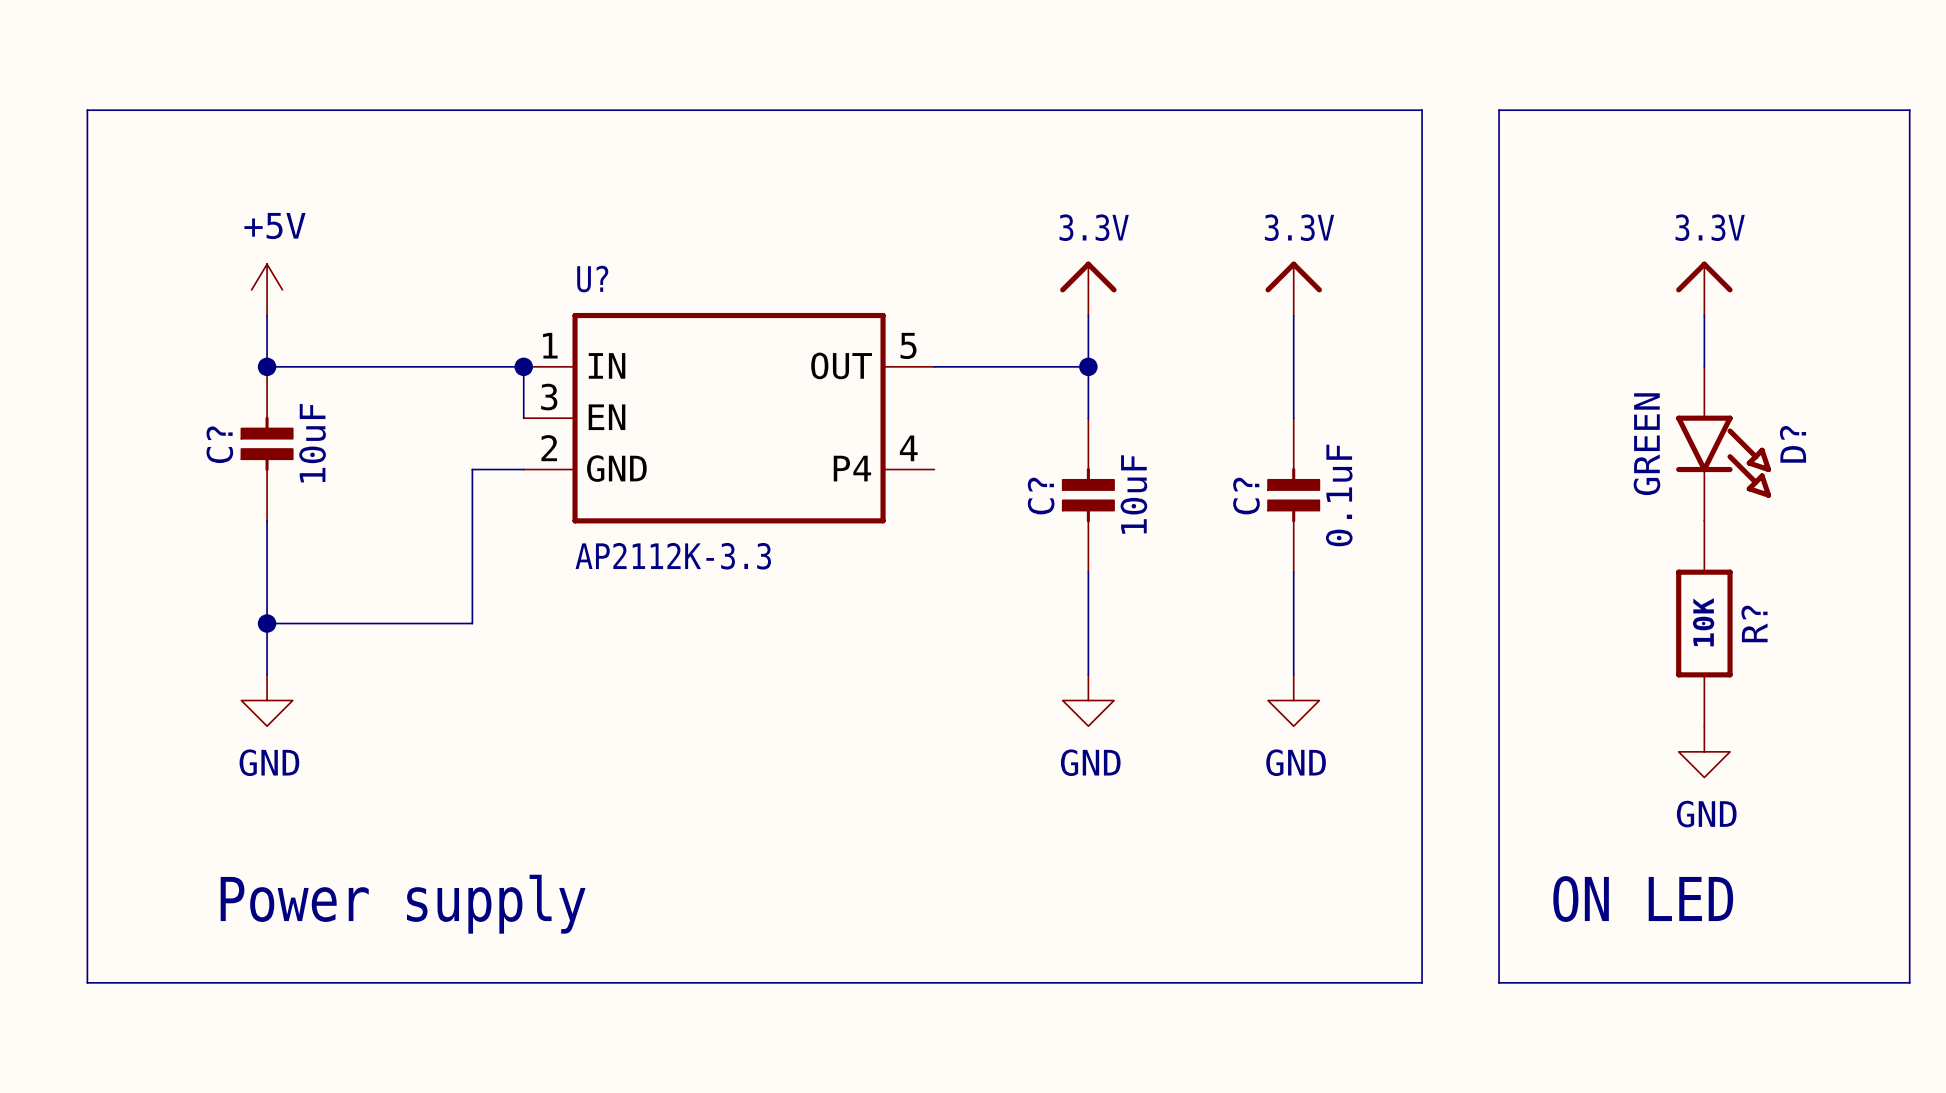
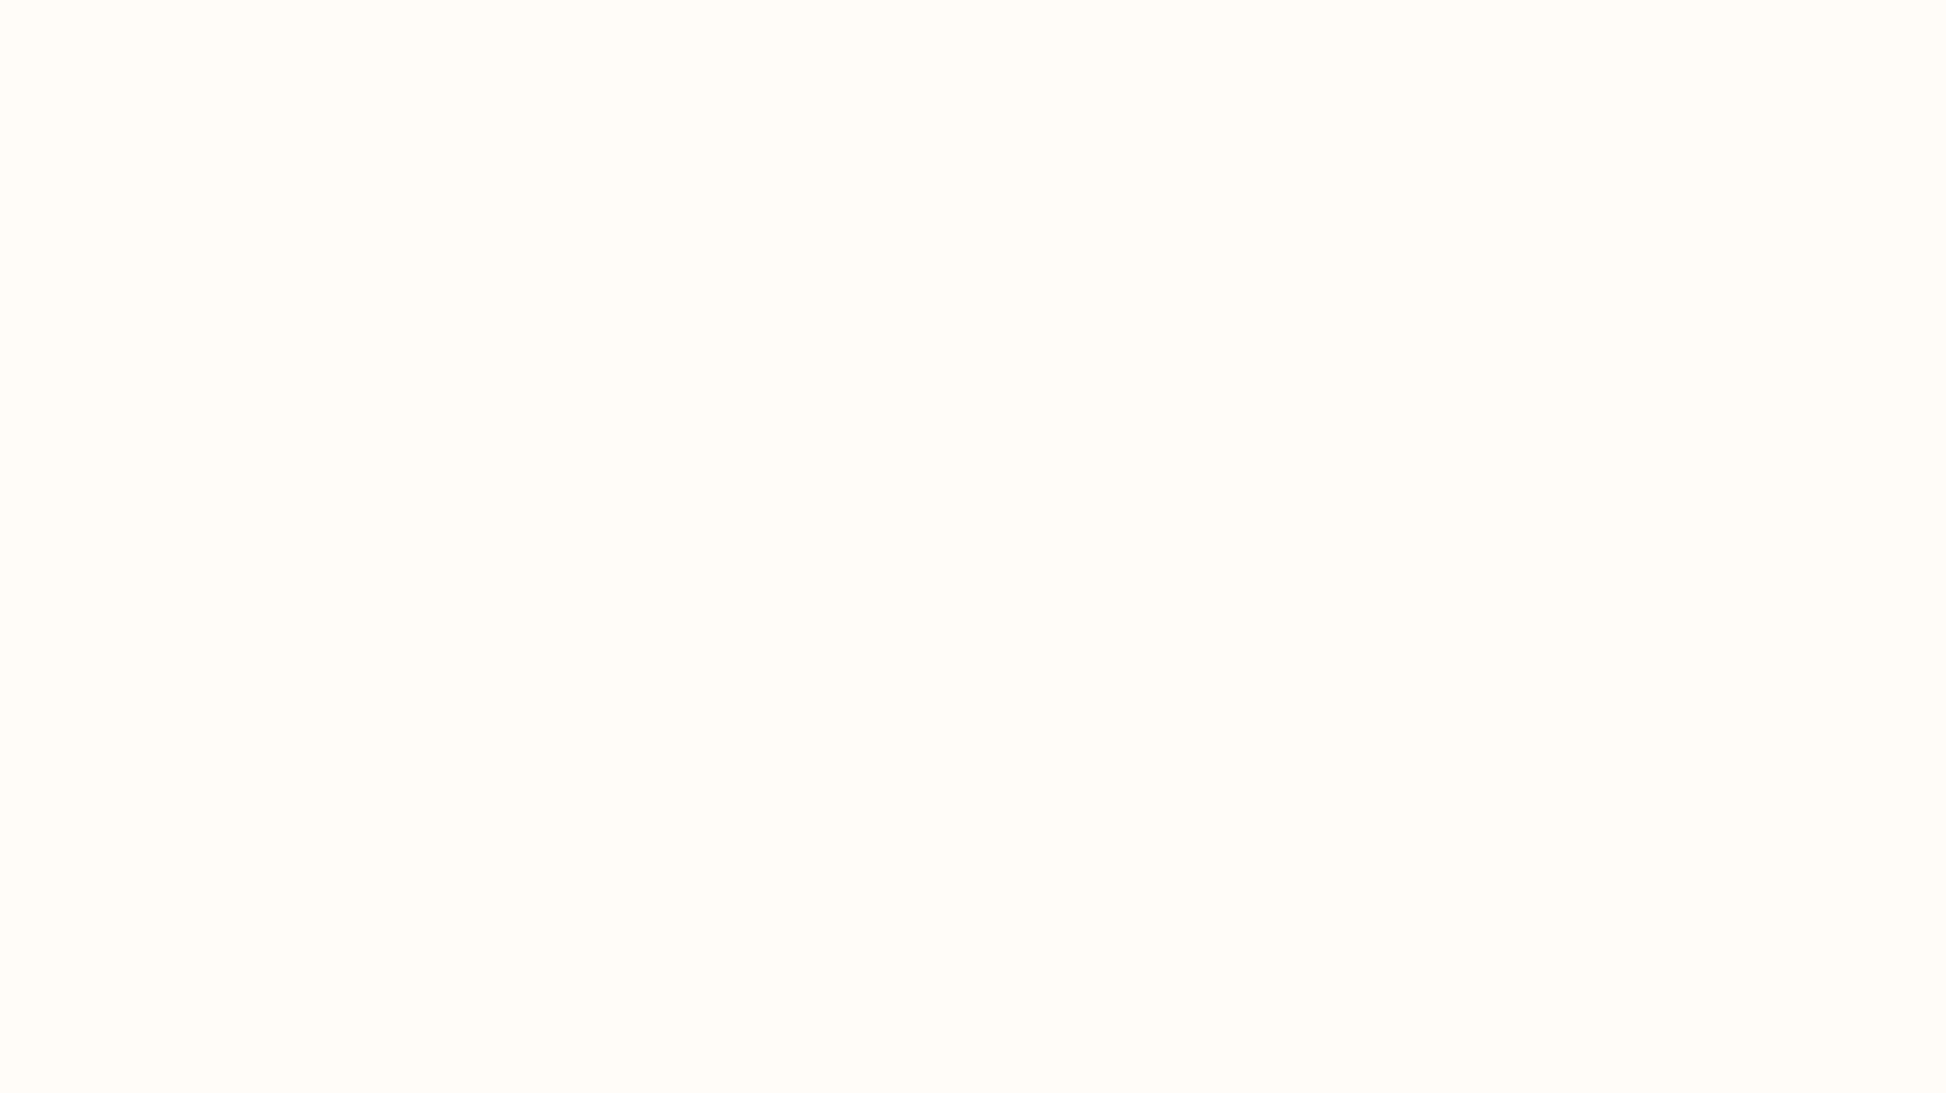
line: (87, 110) (1422, 110) (1422, 982) (87, 982) (87, 110) -> none
line: (1499, 110) (1499, 982) (1909, 982) (1909, 110) (1499, 110) -> none
power symbol: 3.3V (1088, 288) -> none
power symbol: 3.3V (1293, 288) -> none
power symbol: 3.3V (1704, 288) -> none
power symbol: +5V (267, 289) -> none
wire: (267, 315) (267, 366) (523, 366) (523, 418) -> none
wire: (1088, 315) (1088, 418) -> none
wire: (1293, 315) (1293, 418) -> none
wire: (1704, 315) (1704, 366) -> none
junction: (267, 366) -> none
junction: (523, 366) -> none
wire: (934, 366) (1088, 366) -> none
junction: (1088, 366) -> none
U?: AP2112K-3.3 (729, 418) -> none
C?: 10uF (267, 443) -> none
D?: GREEN (1723, 443) -> none
wire: (523, 469) (472, 469) (472, 623) (267, 623) -> none
C?: 10uF (1088, 495) -> none
C?: 0.1uF (1293, 495) -> none
wire: (267, 520) (267, 674) -> none
wire: (1088, 572) (1088, 674) -> none
wire: (1293, 572) (1293, 674) -> none
junction: (267, 623) -> none
R?: 10K (1704, 623) -> none
power symbol: GND (267, 700) -> none
power symbol: GND (1088, 700) -> none
power symbol: GND (1293, 700) -> none
power symbol: GND (1704, 751) -> none
text: ON LED (1643, 899) -> none
text: Power supply (403, 904) -> none

